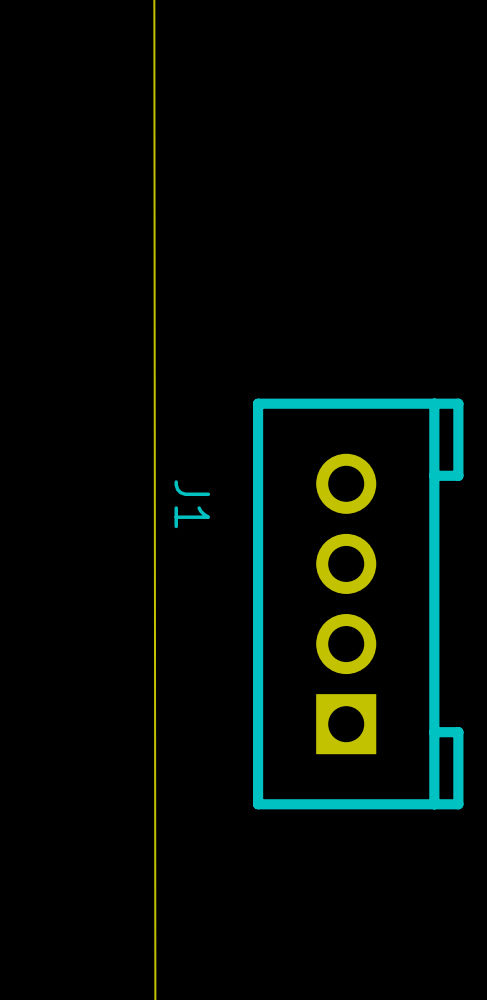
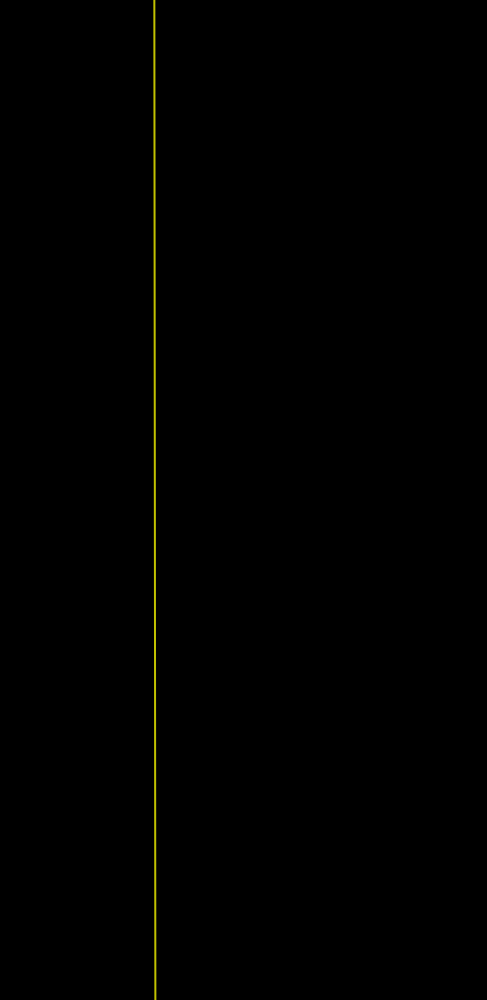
J1: (358, 603) -> none

